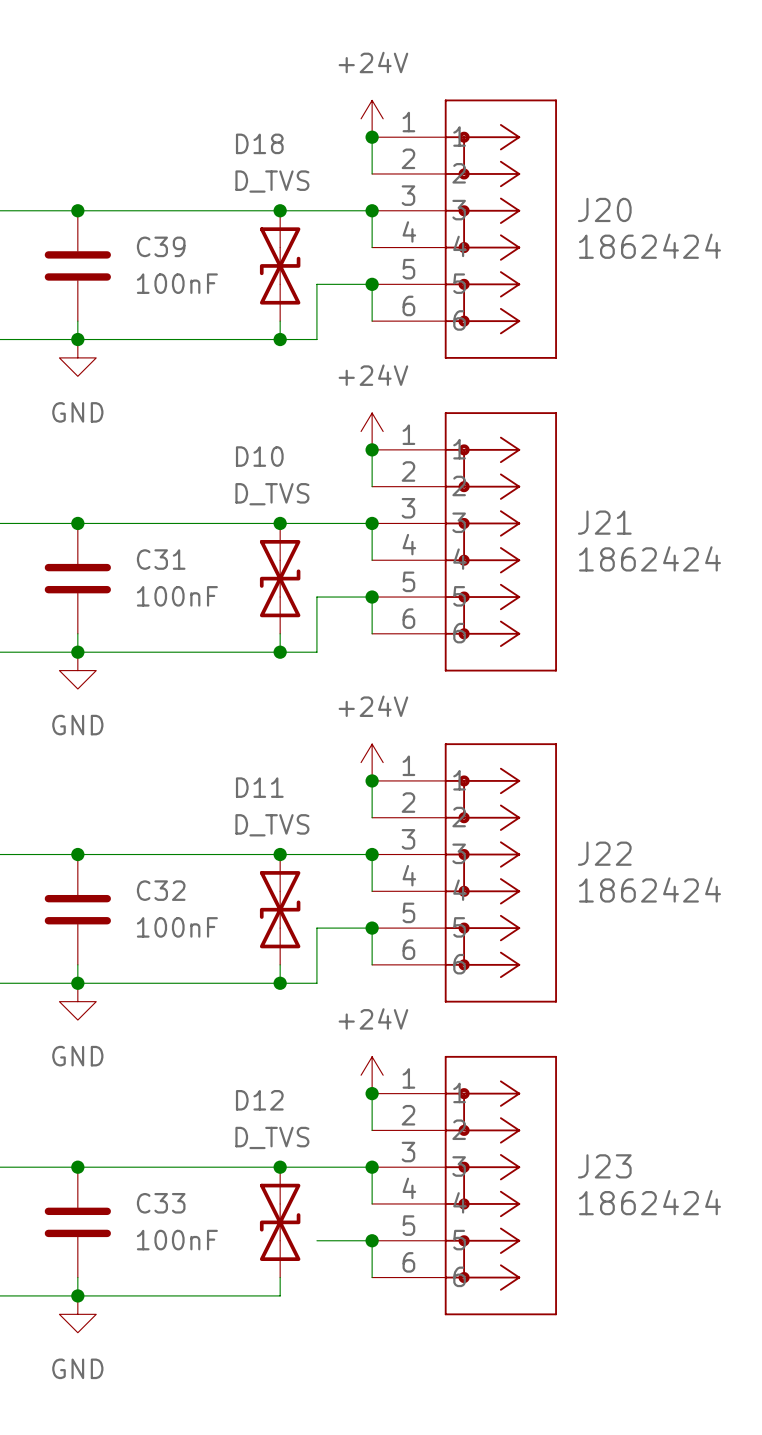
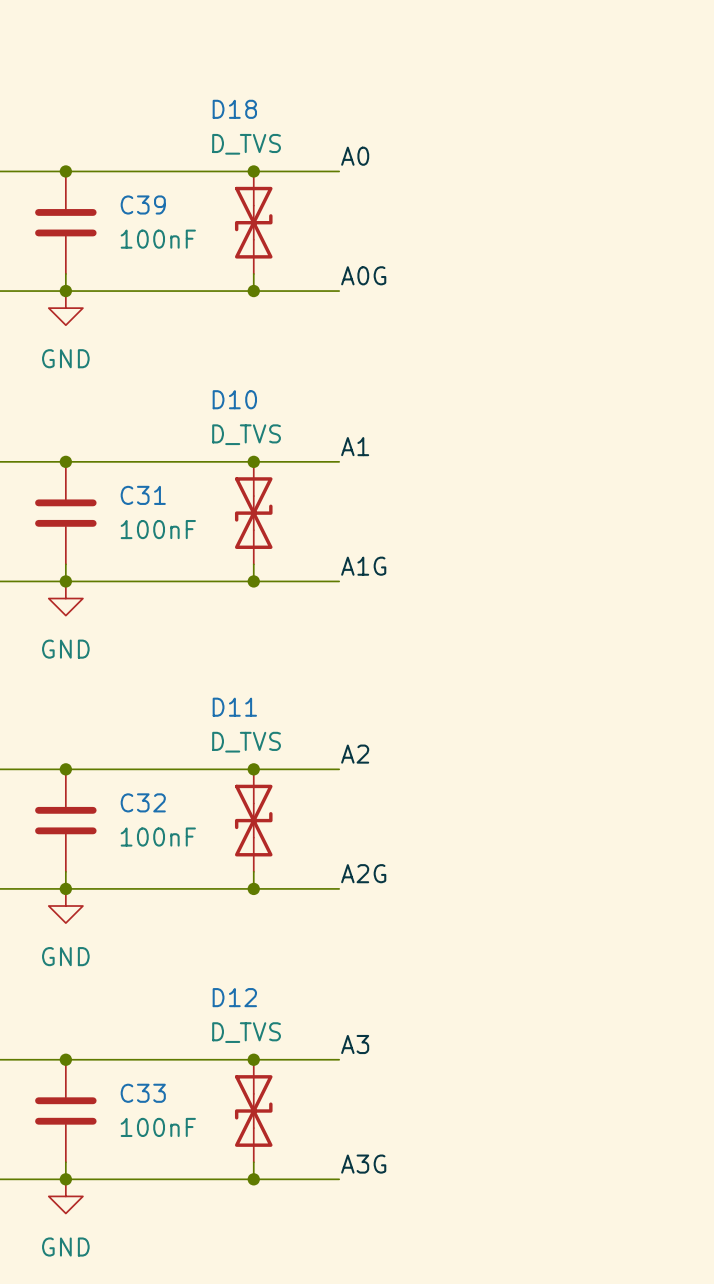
power symbol: +24V (372, 118) -> none
wire: (372, 137) (372, 173) -> none
junction: (372, 137) -> none
label: none -> A0 (355, 156)
wire: (372, 210) (372, 247) -> none
junction: (372, 210) -> none
J20: 1862424 (464, 229) -> none
junction: (372, 284) -> none
wire: (372, 321) (372, 284) (316, 284) (316, 339) -> (339, 291) (287, 291)
label: none -> A0G (363, 275)
power symbol: +24V (372, 431) -> none
wire: (372, 449) (372, 486) -> none
junction: (372, 449) -> none
label: none -> A1 (355, 446)
wire: (372, 523) (372, 560) -> none
junction: (372, 523) -> none
J21: 1862424 (464, 541) -> none
junction: (372, 597) -> none
wire: (372, 633) (372, 597) (316, 597) (316, 652) -> (339, 581) (287, 581)
label: none -> A1G (363, 566)
power symbol: +24V (372, 762) -> none
wire: (372, 780) (372, 817) -> none
junction: (372, 780) -> none
label: none -> A2 (355, 754)
wire: (372, 854) (372, 891) -> none
junction: (372, 854) -> none
J22: 1862424 (464, 872) -> none
junction: (372, 928) -> none
wire: (372, 964) (372, 928) (316, 928) (316, 983) -> (339, 888) (287, 888)
label: none -> A2G (363, 873)
power symbol: +24V (372, 1075) -> none
wire: (372, 1093) (372, 1130) -> none
junction: (372, 1093) -> none
label: none -> A3 (355, 1044)
wire: (372, 1167) (372, 1203) -> none
junction: (372, 1167) -> none
J23: 1862424 (464, 1185) -> none
wire: (316, 1240) (372, 1240) (372, 1277) -> none
junction: (372, 1240) -> none
label: none -> A3G (363, 1164)
wire: none -> (253, 1179) (339, 1179)
junction: none -> (253, 1179)

